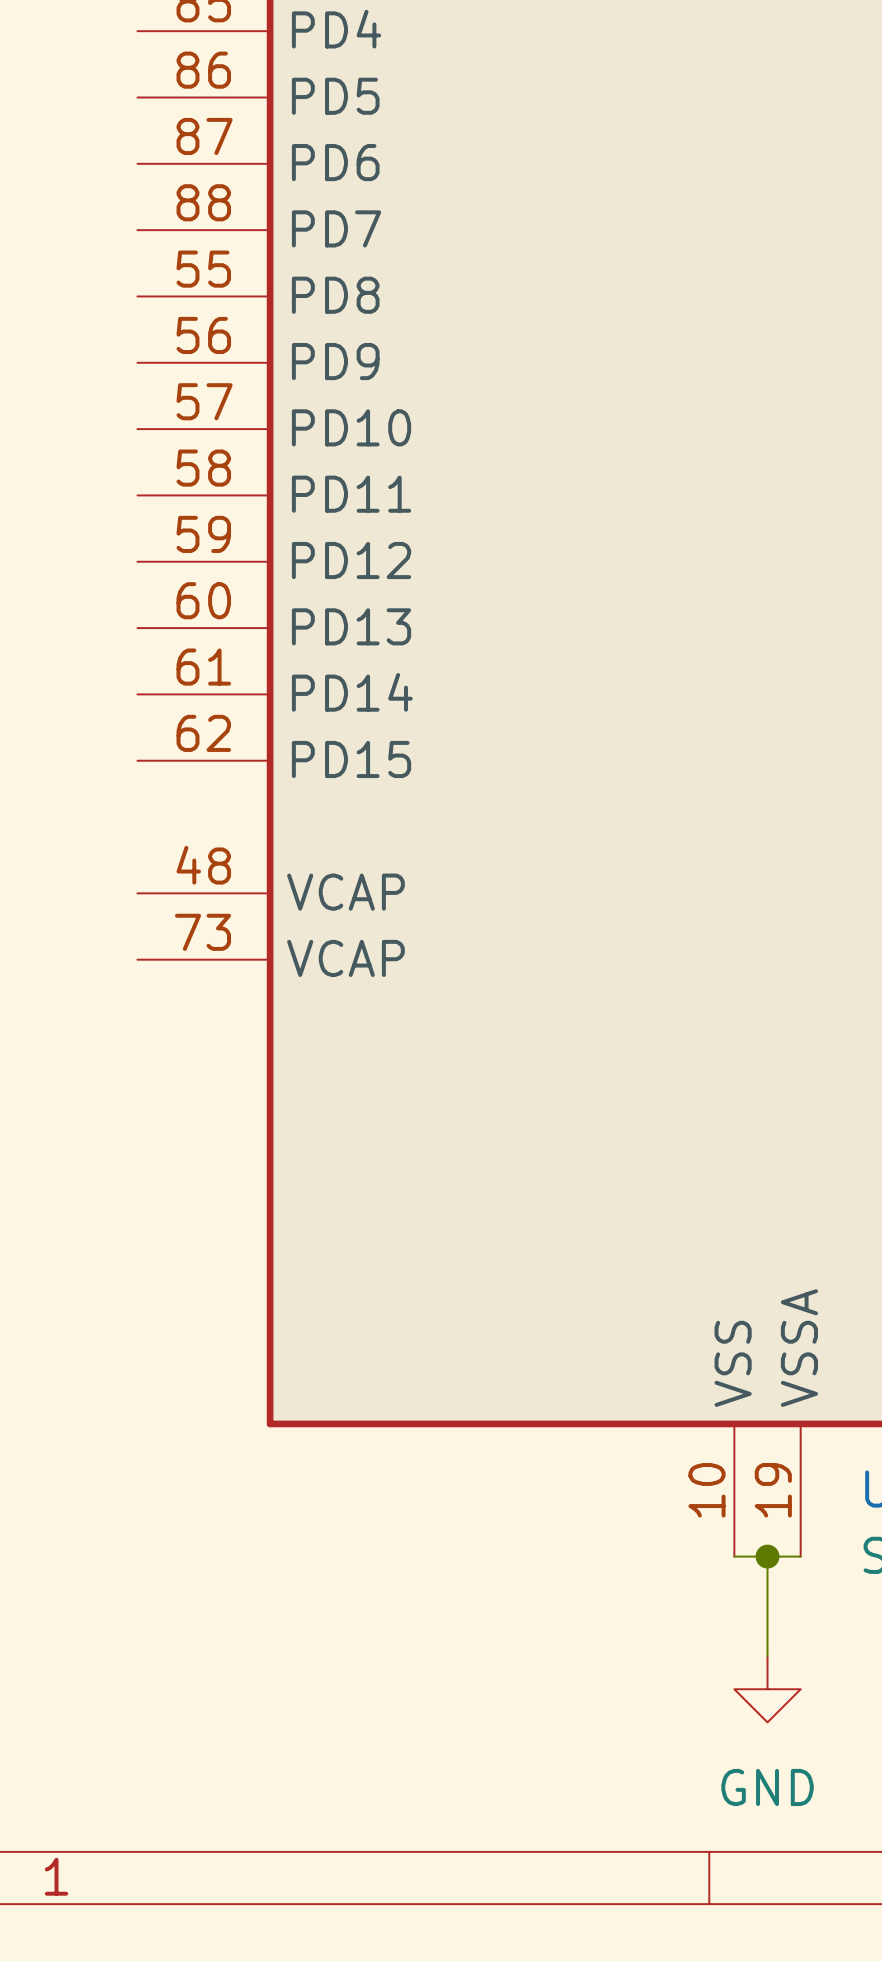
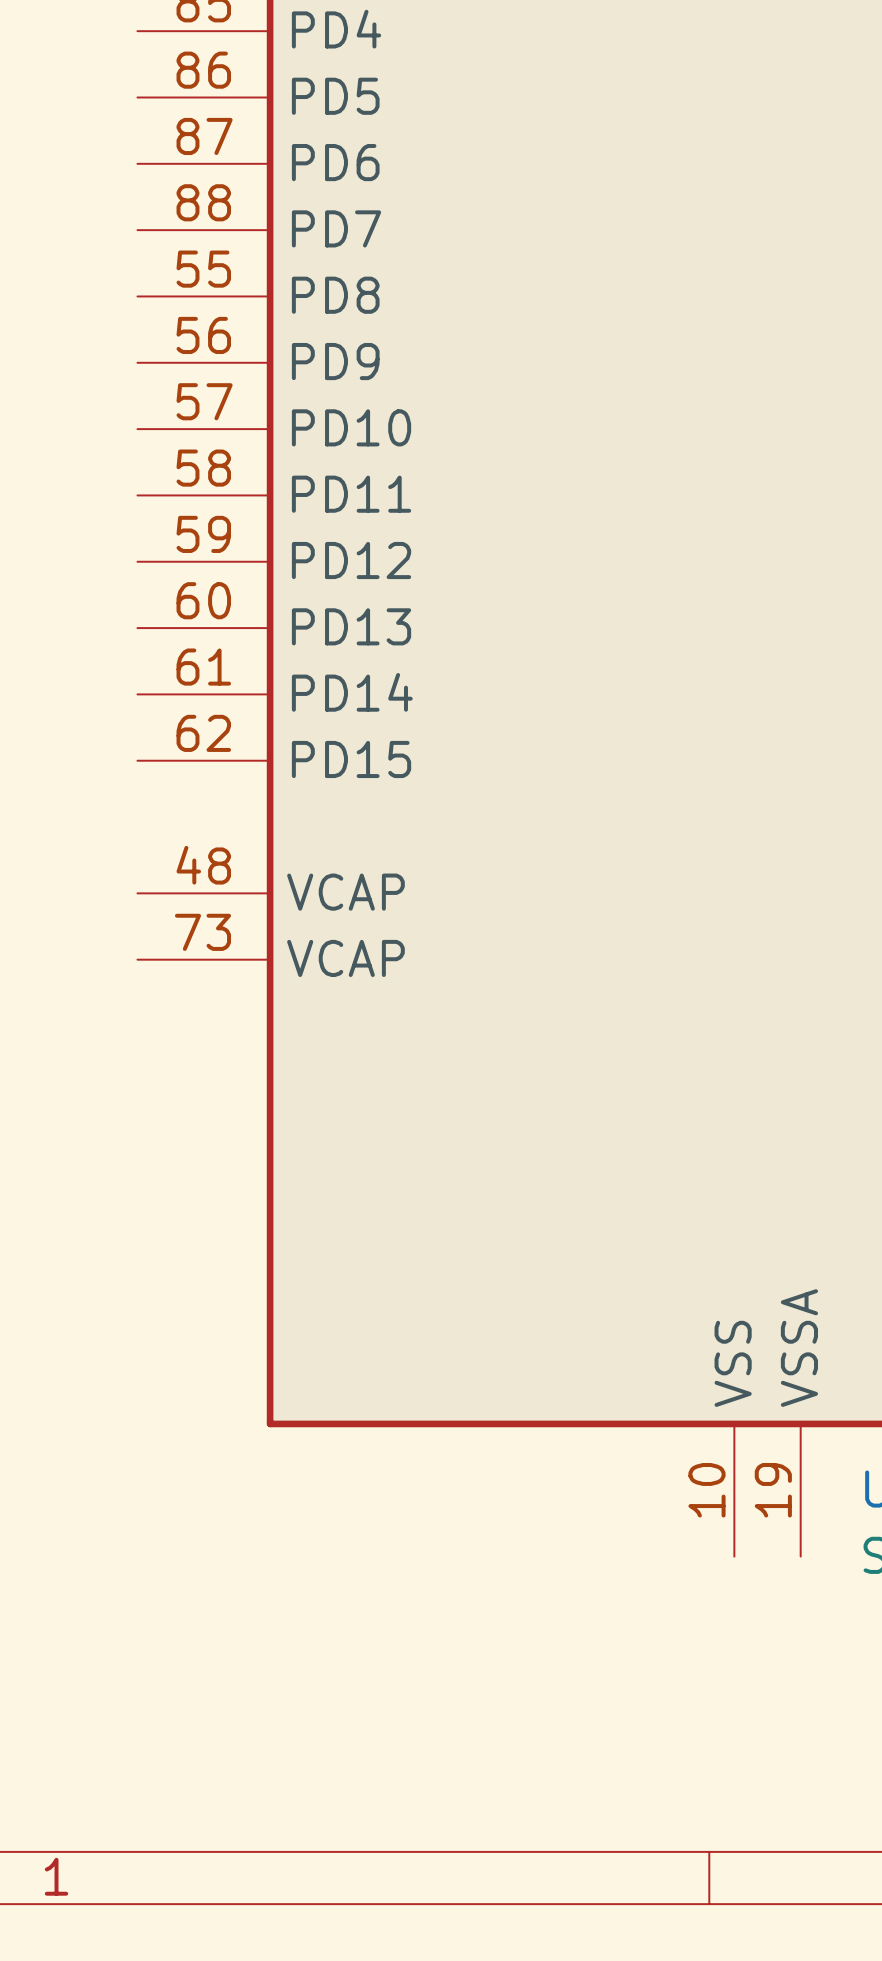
wire: (734, 1556) (800, 1556) -> none
wire: (767, 1556) (767, 1656) -> none
junction: (767, 1556) -> none
power symbol: GND (767, 1689) -> none

